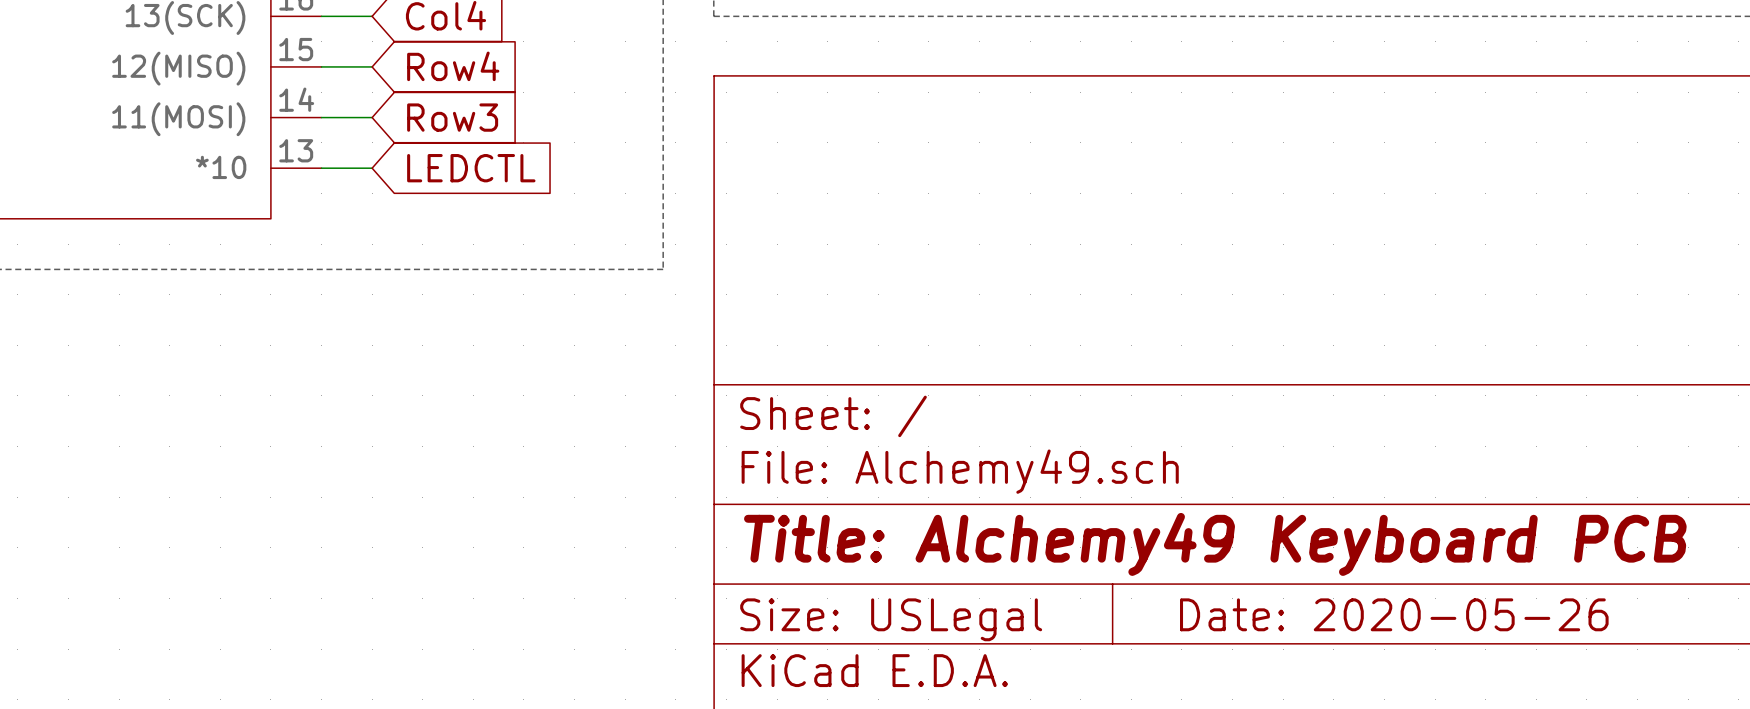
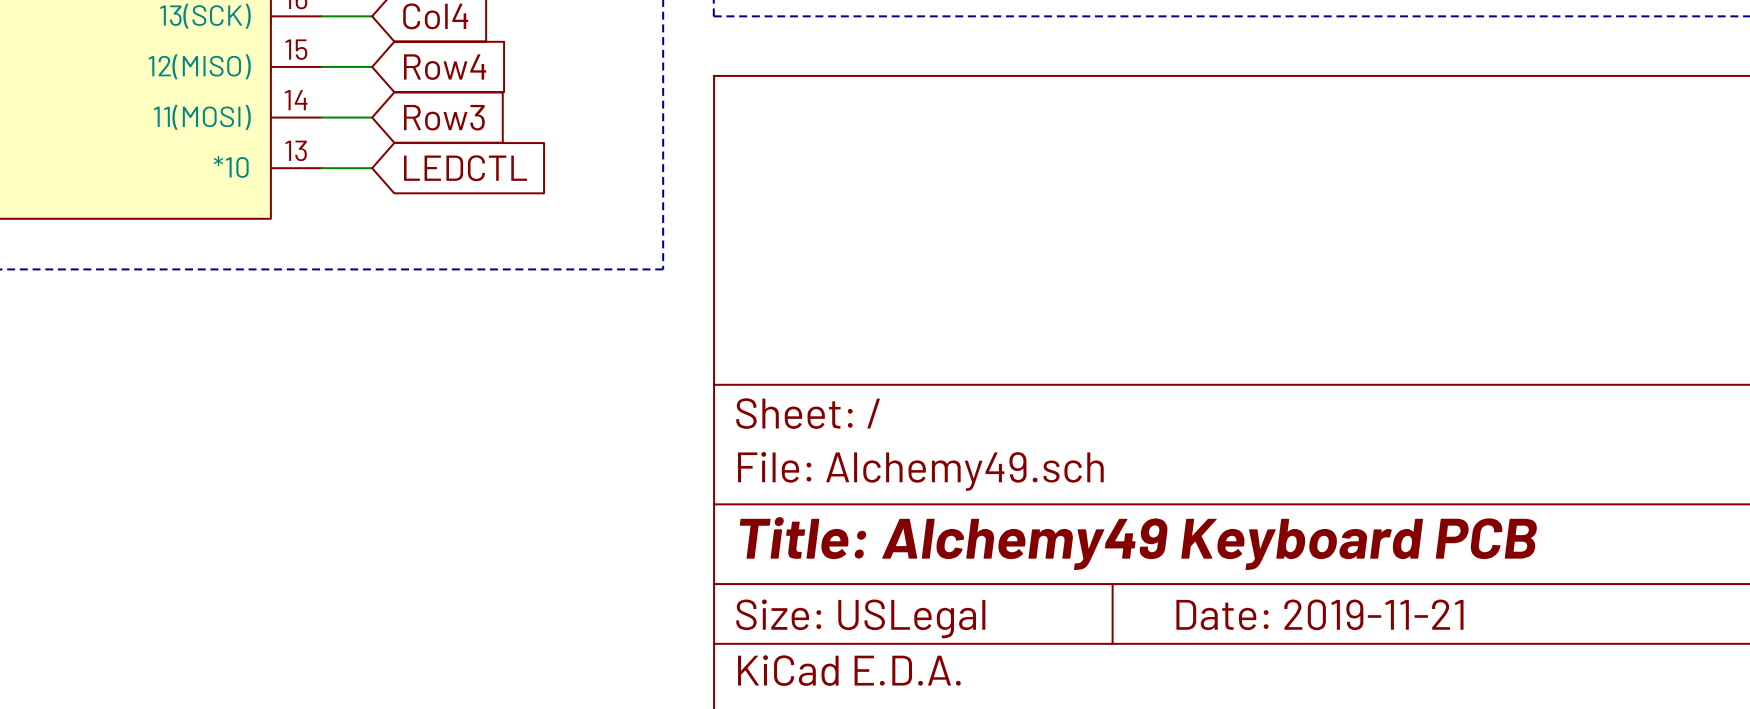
title block: Date: 2020-05-26 (1394, 614) -> Date: 2019-11-21 (1319, 614)

